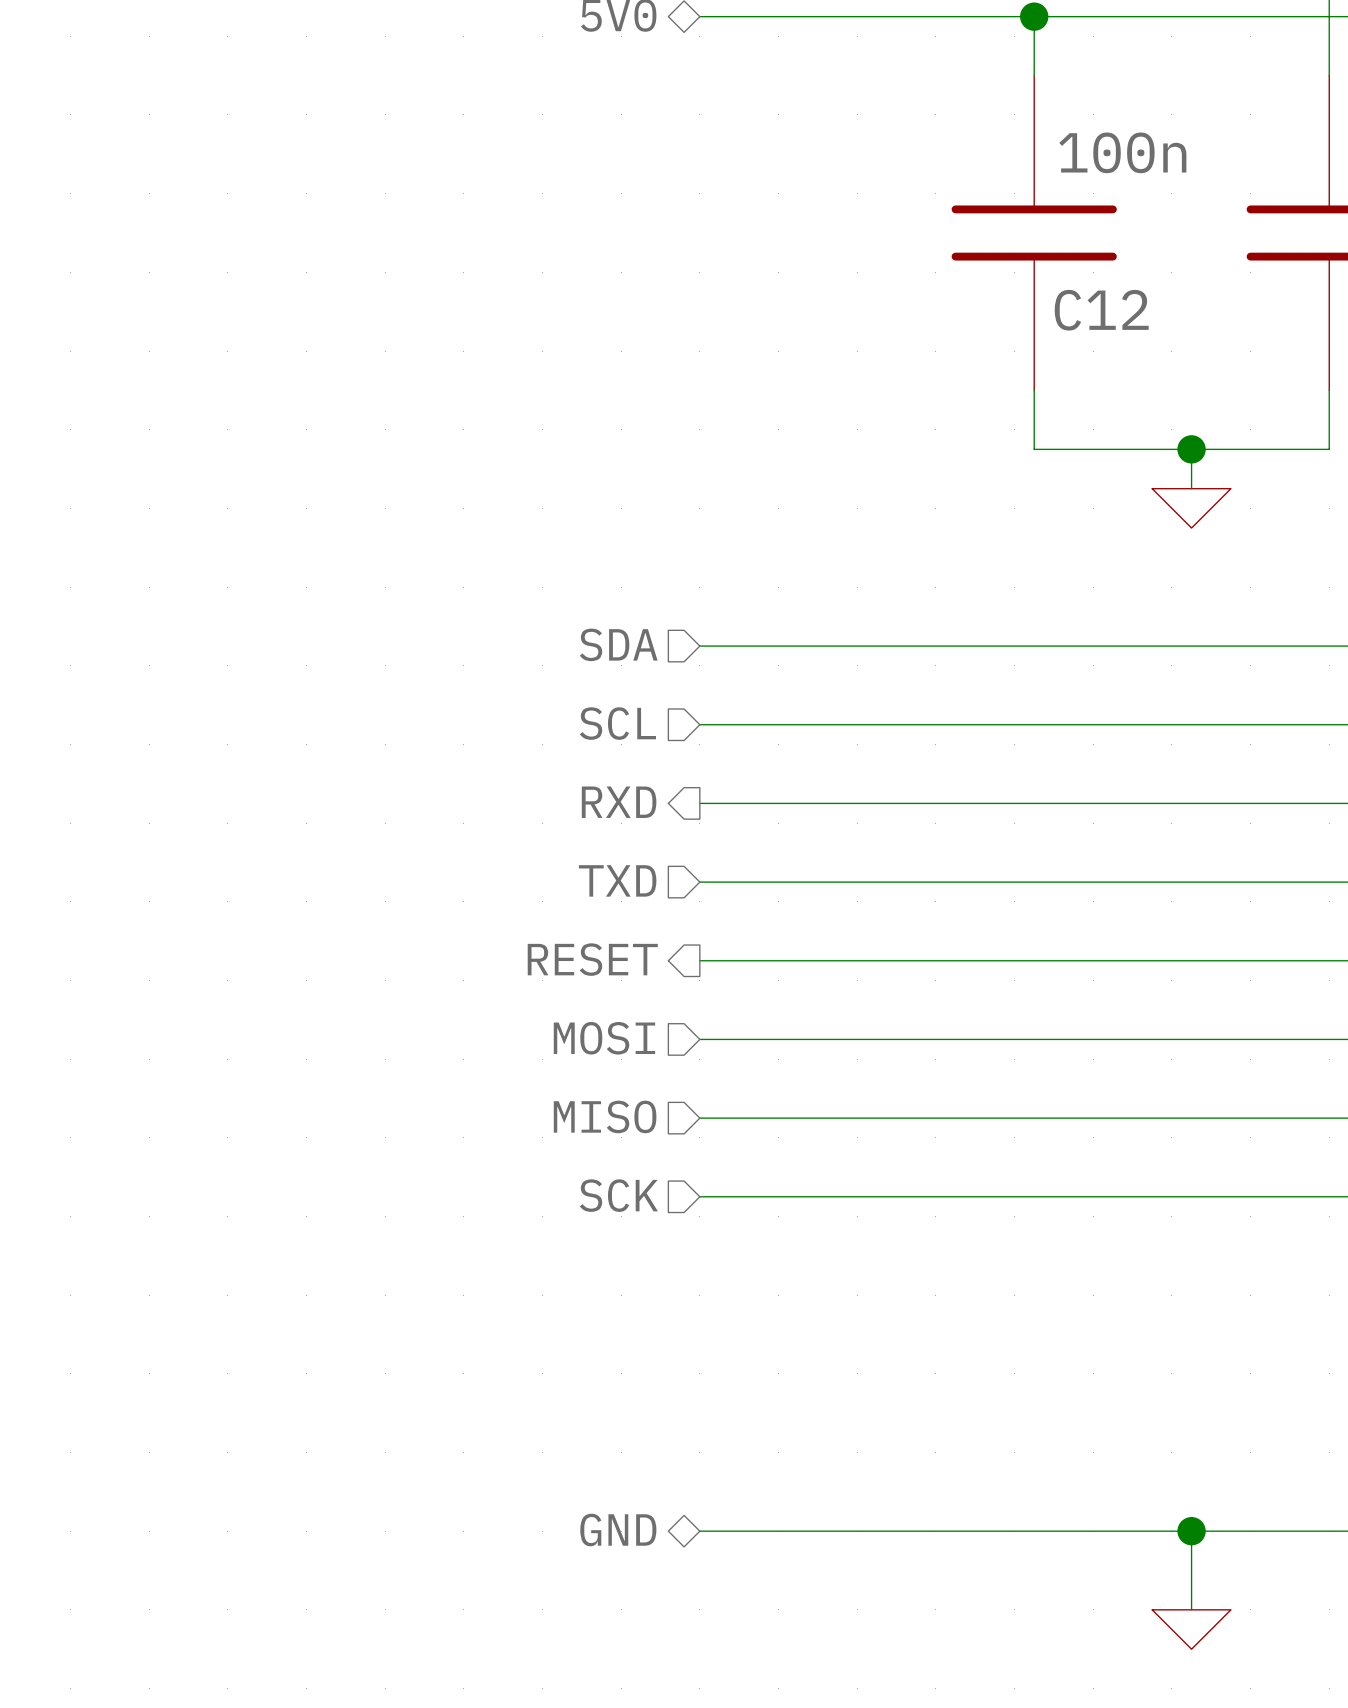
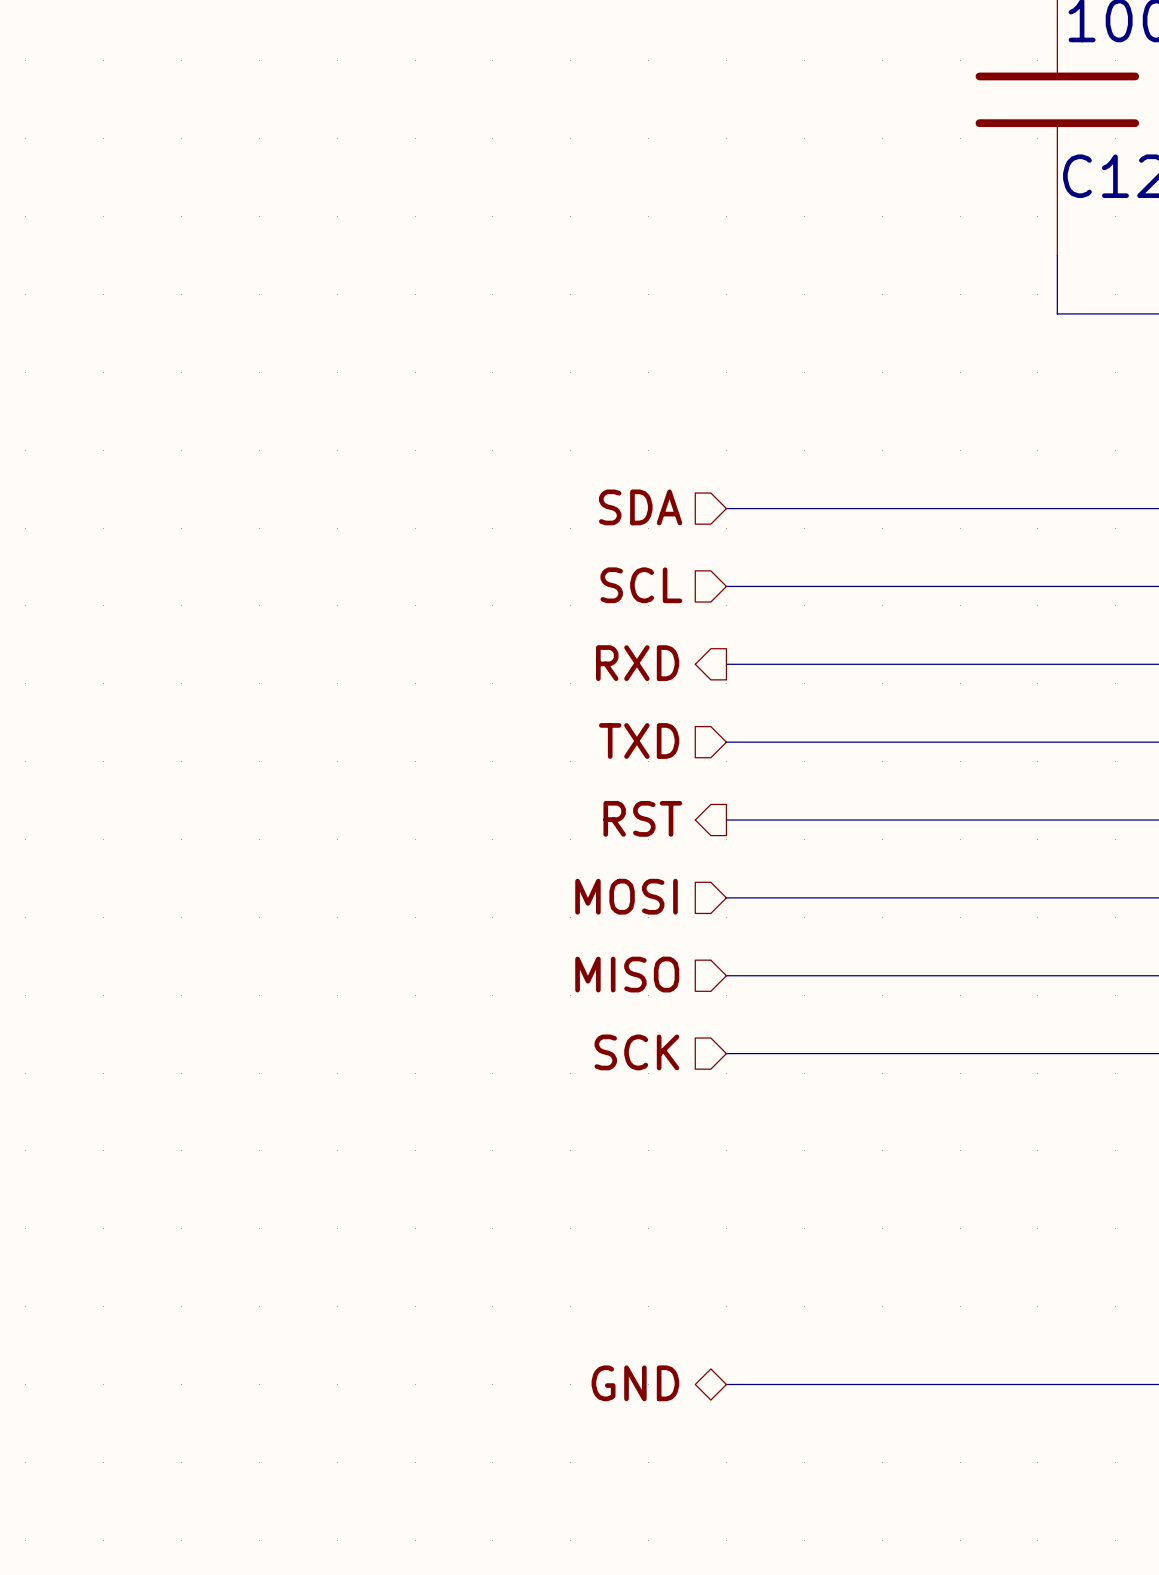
hierarchical label: RESET (592, 959) -> RST (642, 818)

